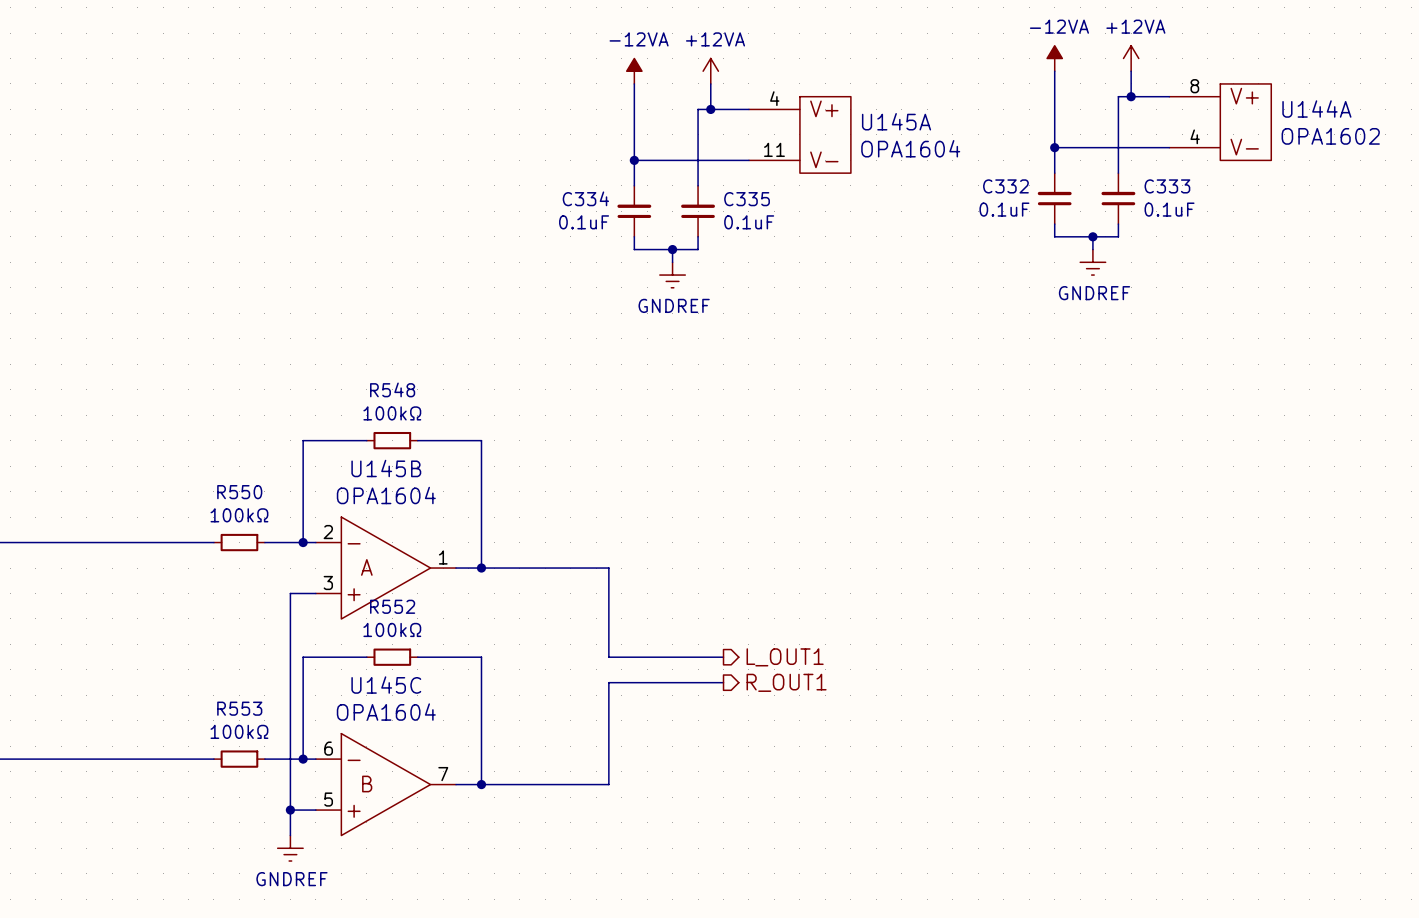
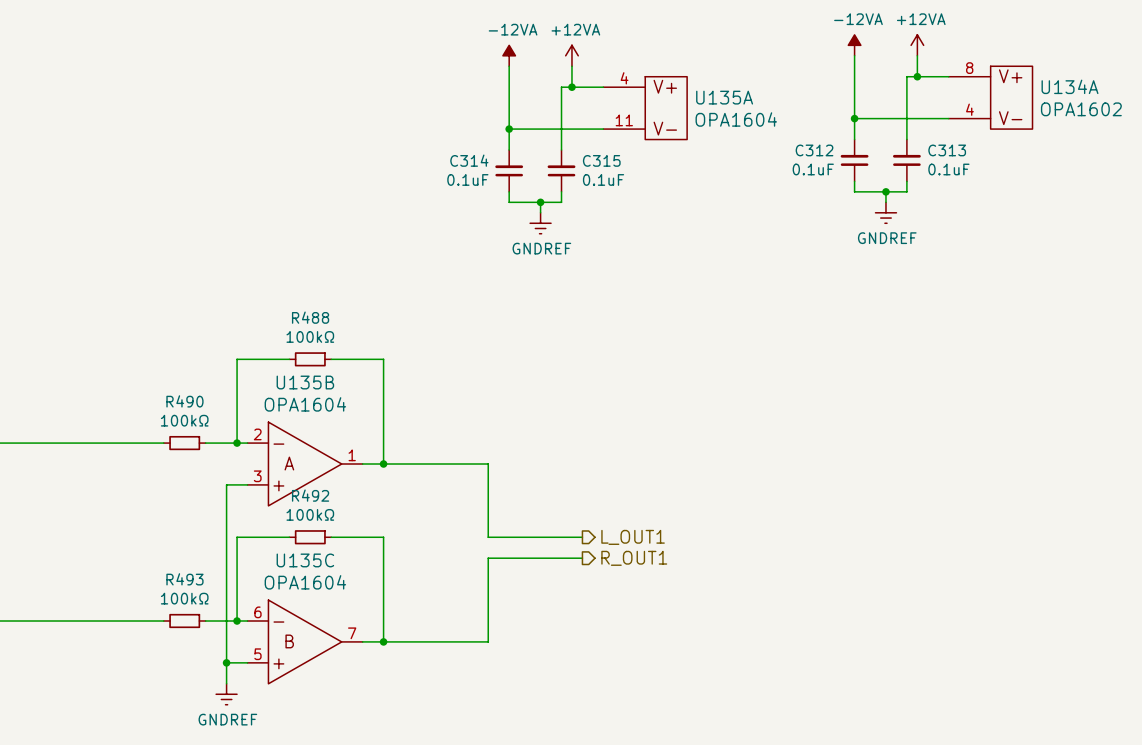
U144A name: U144A (1316, 109) -> U134A (1070, 86)
U145A name: U145A (896, 121) -> U135A (724, 97)
C332 name: C332 (1005, 186) -> C312 (814, 150)
C333 name: C333 (1167, 186) -> C313 (947, 150)
C334 name: C334 (585, 198) -> C314 (469, 160)
C335 name: C335 (747, 199) -> C315 (601, 160)
R548 name: R548 (392, 389) -> R488 (310, 317)
U145B name: U145B (386, 468) -> U135B (305, 382)
R550 name: R550 (239, 492) -> R490 (184, 401)
R552 name: R552 (392, 606) -> R492 (310, 495)
U145C name: U145C (386, 685) -> U135C (305, 560)
R553 name: R553 (239, 708) -> R493 (184, 579)

